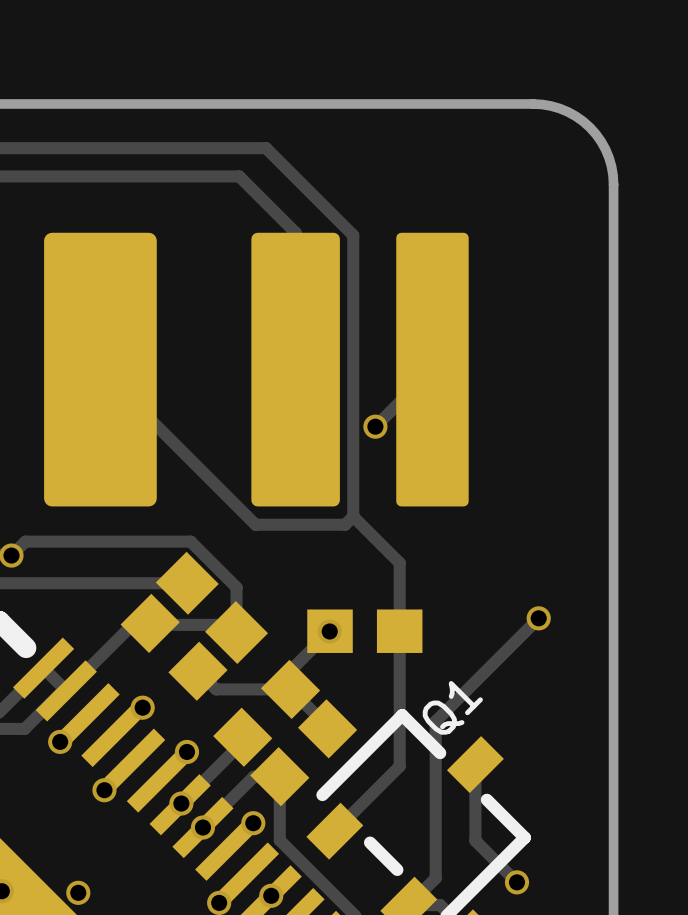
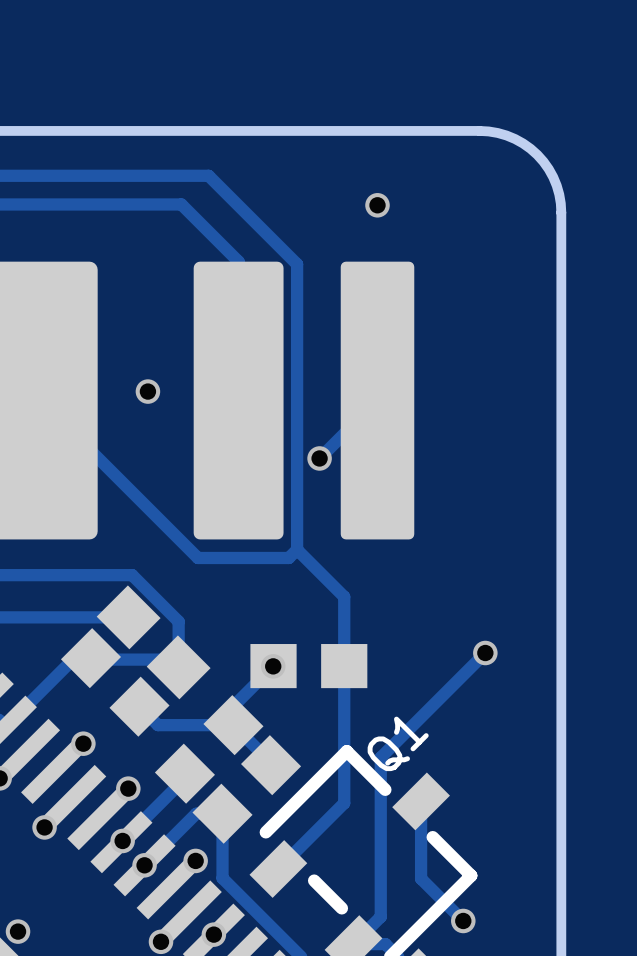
via: none -> (377, 205)
via: none -> (147, 391)

